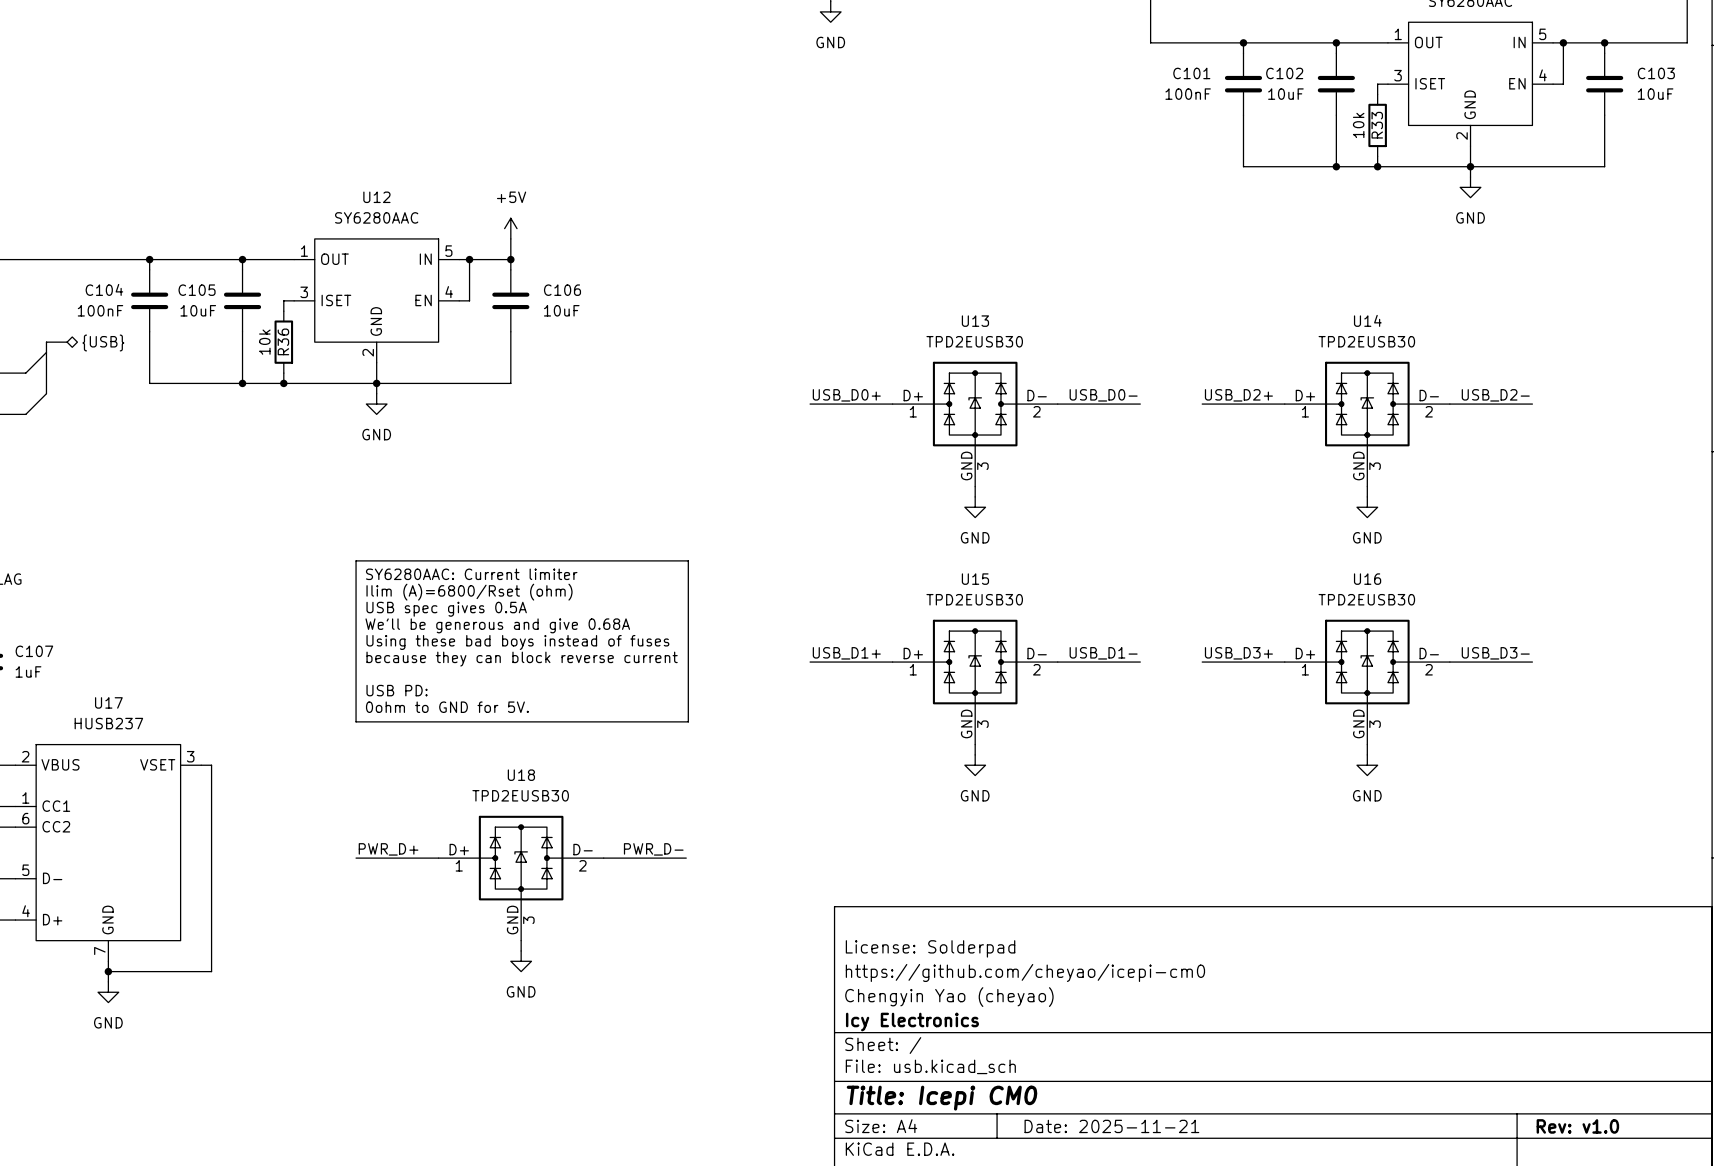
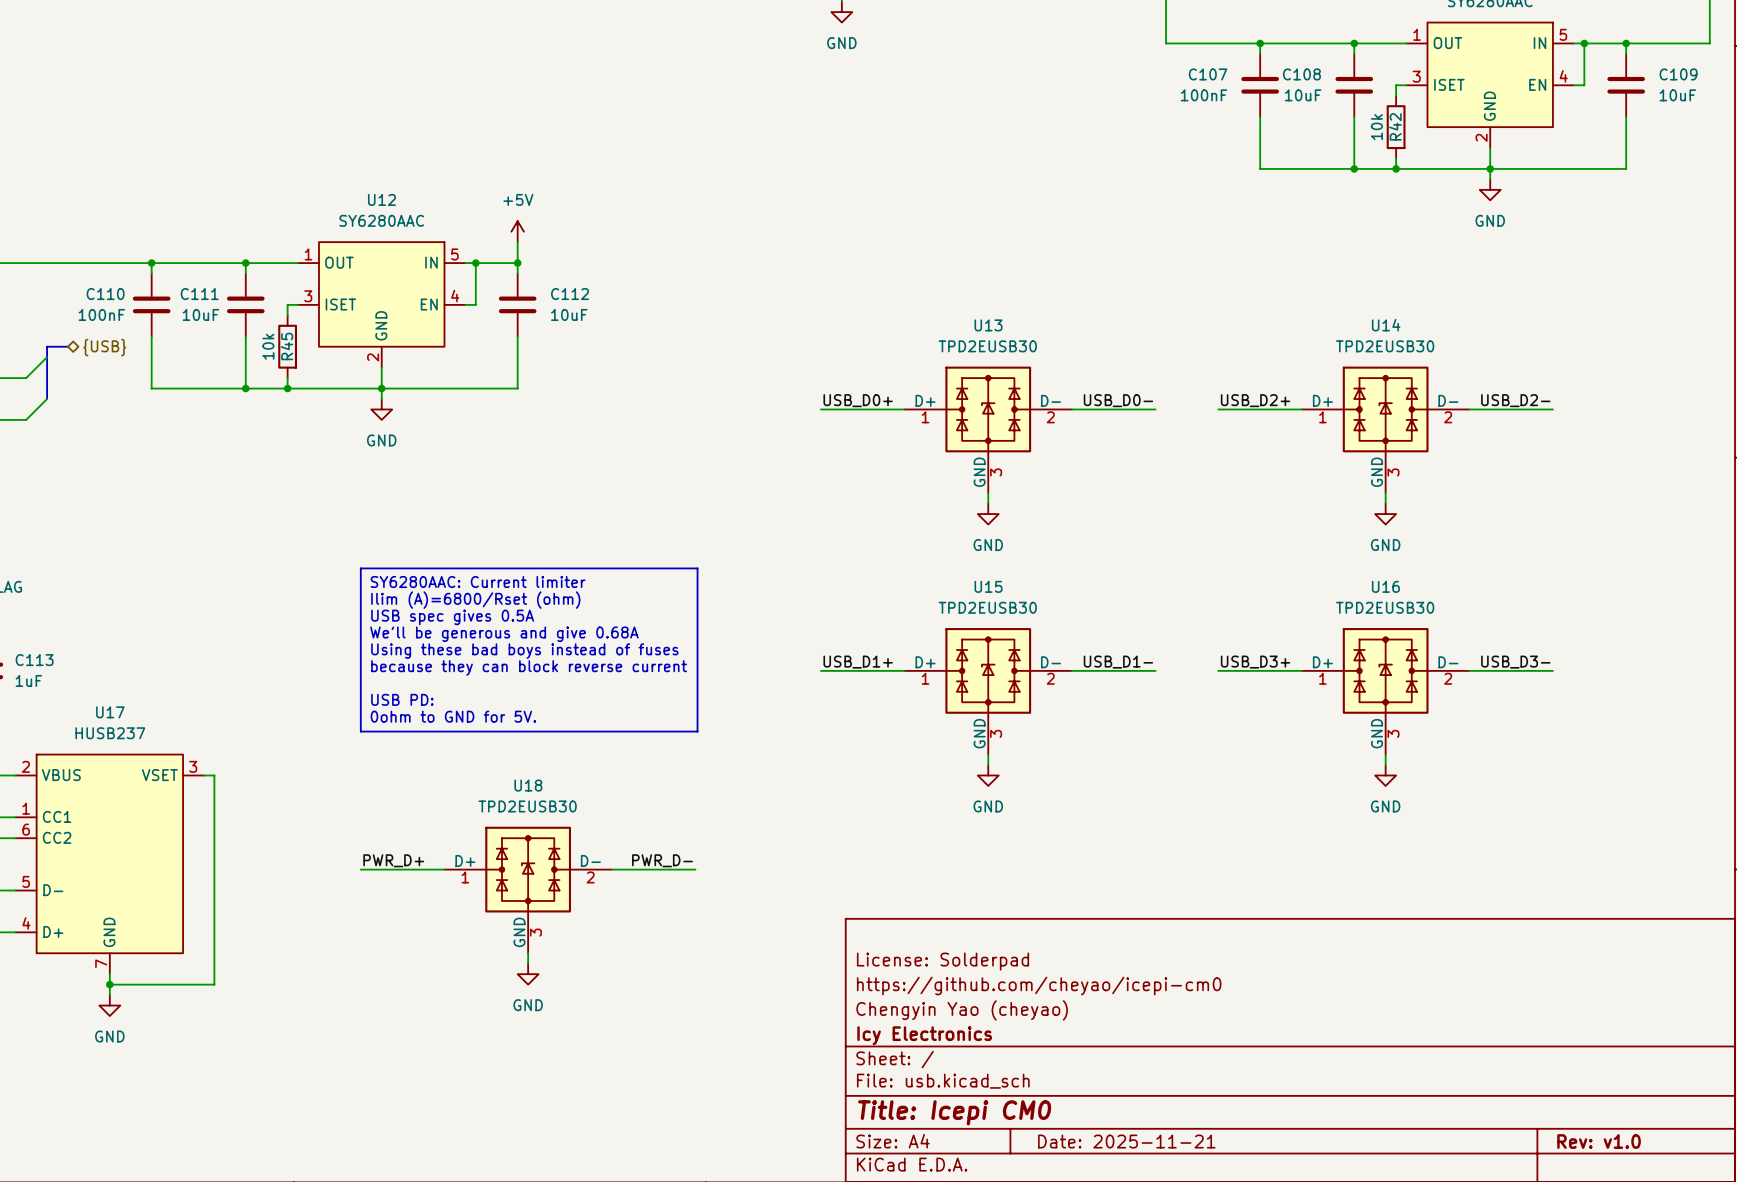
C101 name: C101 (1191, 73) -> C107 (1208, 74)
C102 name: C102 (1284, 73) -> C108 (1301, 74)
C103 name: C103 (1656, 73) -> C109 (1678, 74)
R33 name: R33 (1377, 125) -> R42 (1395, 126)
C104 name: C104 (104, 289) -> C110 (105, 294)
C105 name: C105 (197, 290) -> C111 (199, 294)
C106 name: C106 (562, 290) -> C112 (570, 294)
R36 name: R36 (283, 341) -> R45 (286, 346)
C107 name: C107 (34, 651) -> C113 (34, 660)

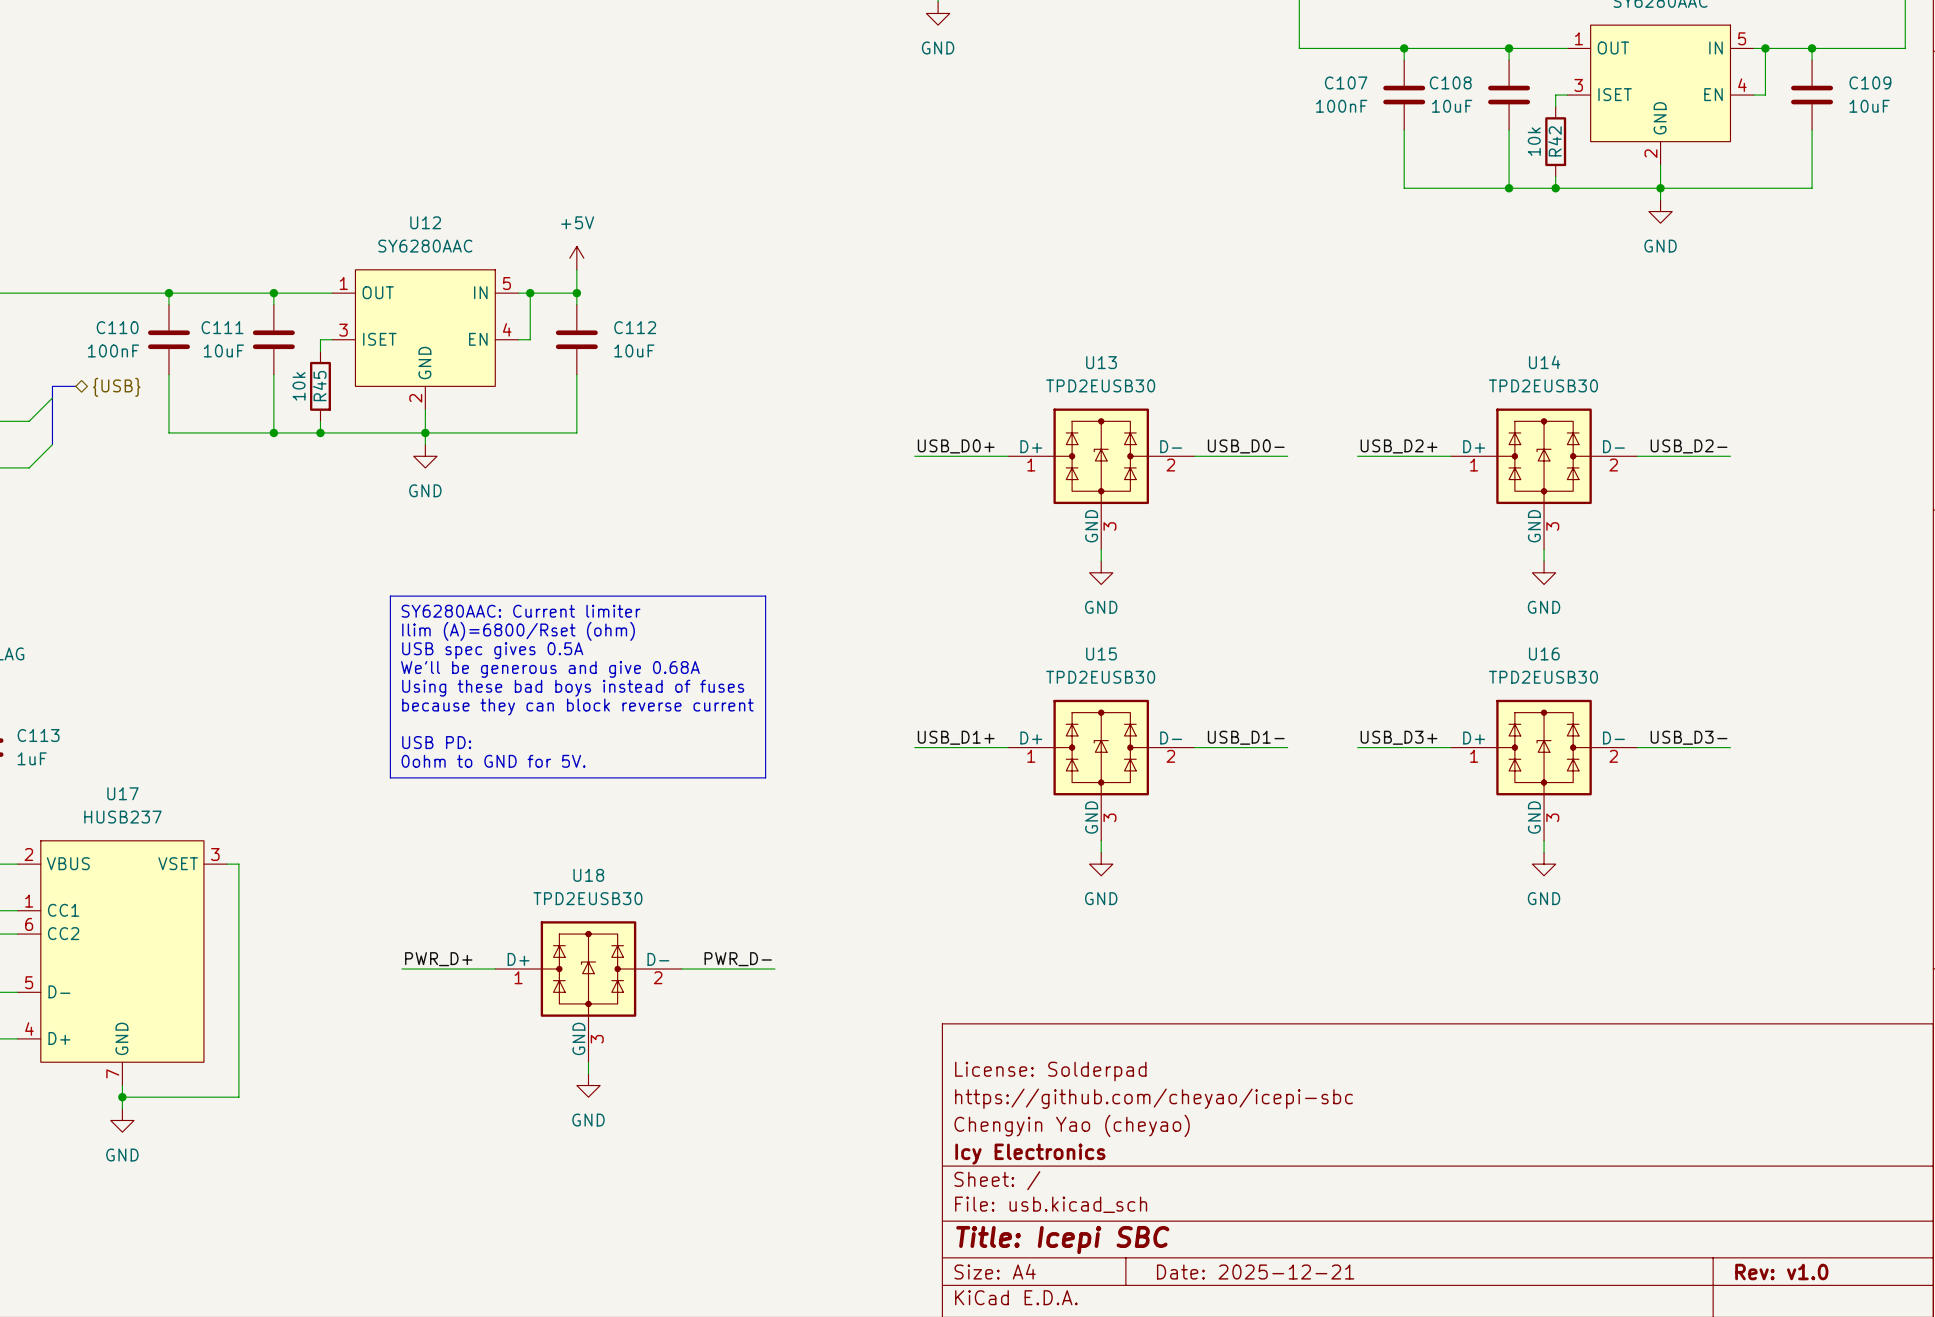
line: (360, 568) (697, 568) (697, 731) (360, 731) (360, 568) -> (390, 596) (390, 777) (765, 777) (765, 596) (390, 596)
text position: SY6280AAC: Current limiter (478, 581) -> SY6280AAC: Current limiter (521, 611)
text position: Ilim (A)=6800/Rset (ohm) (475, 600) -> Ilim (A)=6800/Rset (ohm) (518, 631)
text position: USB spec gives 0.5A (452, 617) -> USB spec gives 0.5A (492, 650)
text position: We'll be generous and give 0.68A (504, 634) -> We'll be generous and give 0.68A (550, 669)
text position: Using these bad boys instead of fuses (524, 651) -> Using these bad boys instead of fuses (573, 688)
text position: because they can block reverse current (529, 667) -> because they can block reverse current (577, 706)
text position: USB PD: (402, 699) -> USB PD: (436, 742)
text position: 0ohm to GND for 5V. (453, 716) -> 0ohm to GND for 5V. (493, 761)
title block: https://github.com/cheyao/icepi-cm0 (1039, 986) -> https://github.com/cheyao/icepi-sbc (1154, 1098)
title block: Title: Icepi CM0 (954, 1112) -> Title: Icepi SBC (1062, 1240)
title block: Date: 2025-11-21 (1126, 1141) -> Date: 2025-12-21 (1255, 1272)

